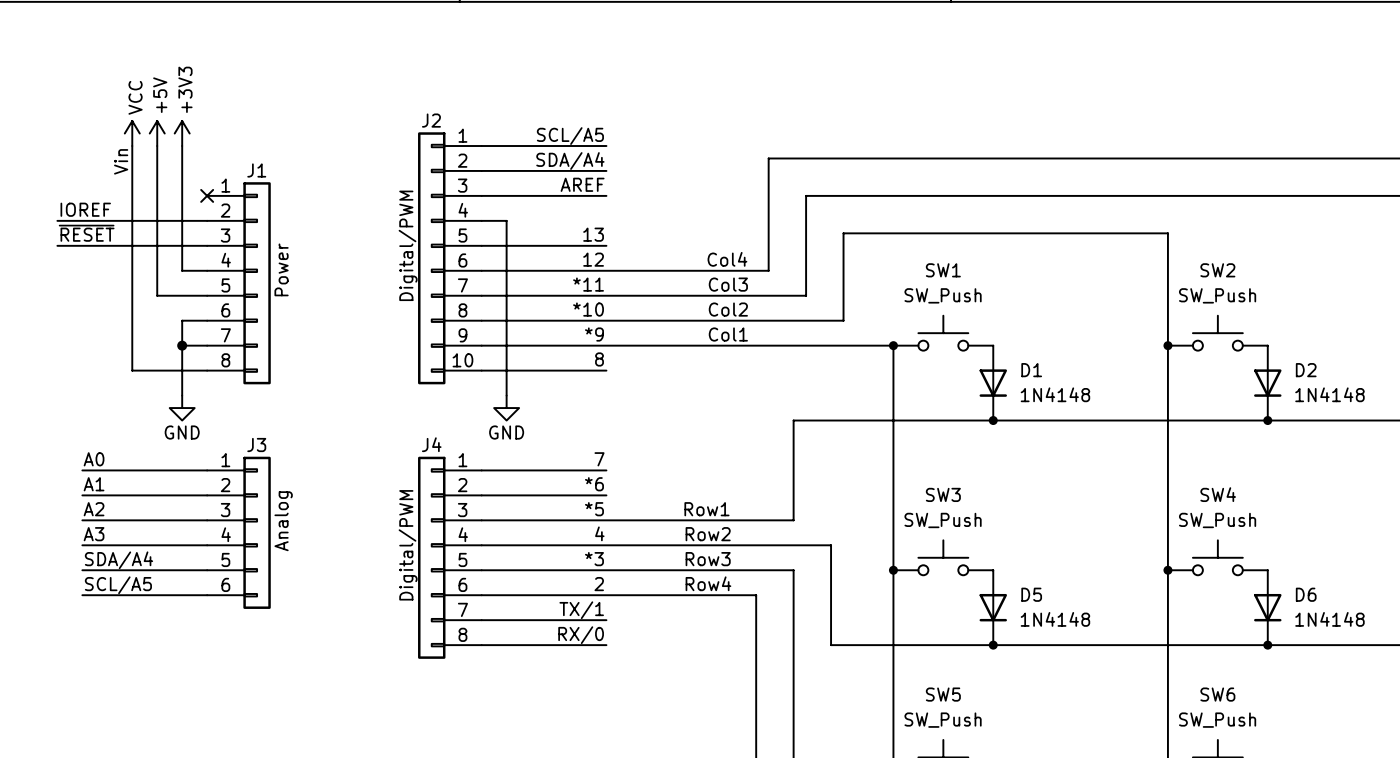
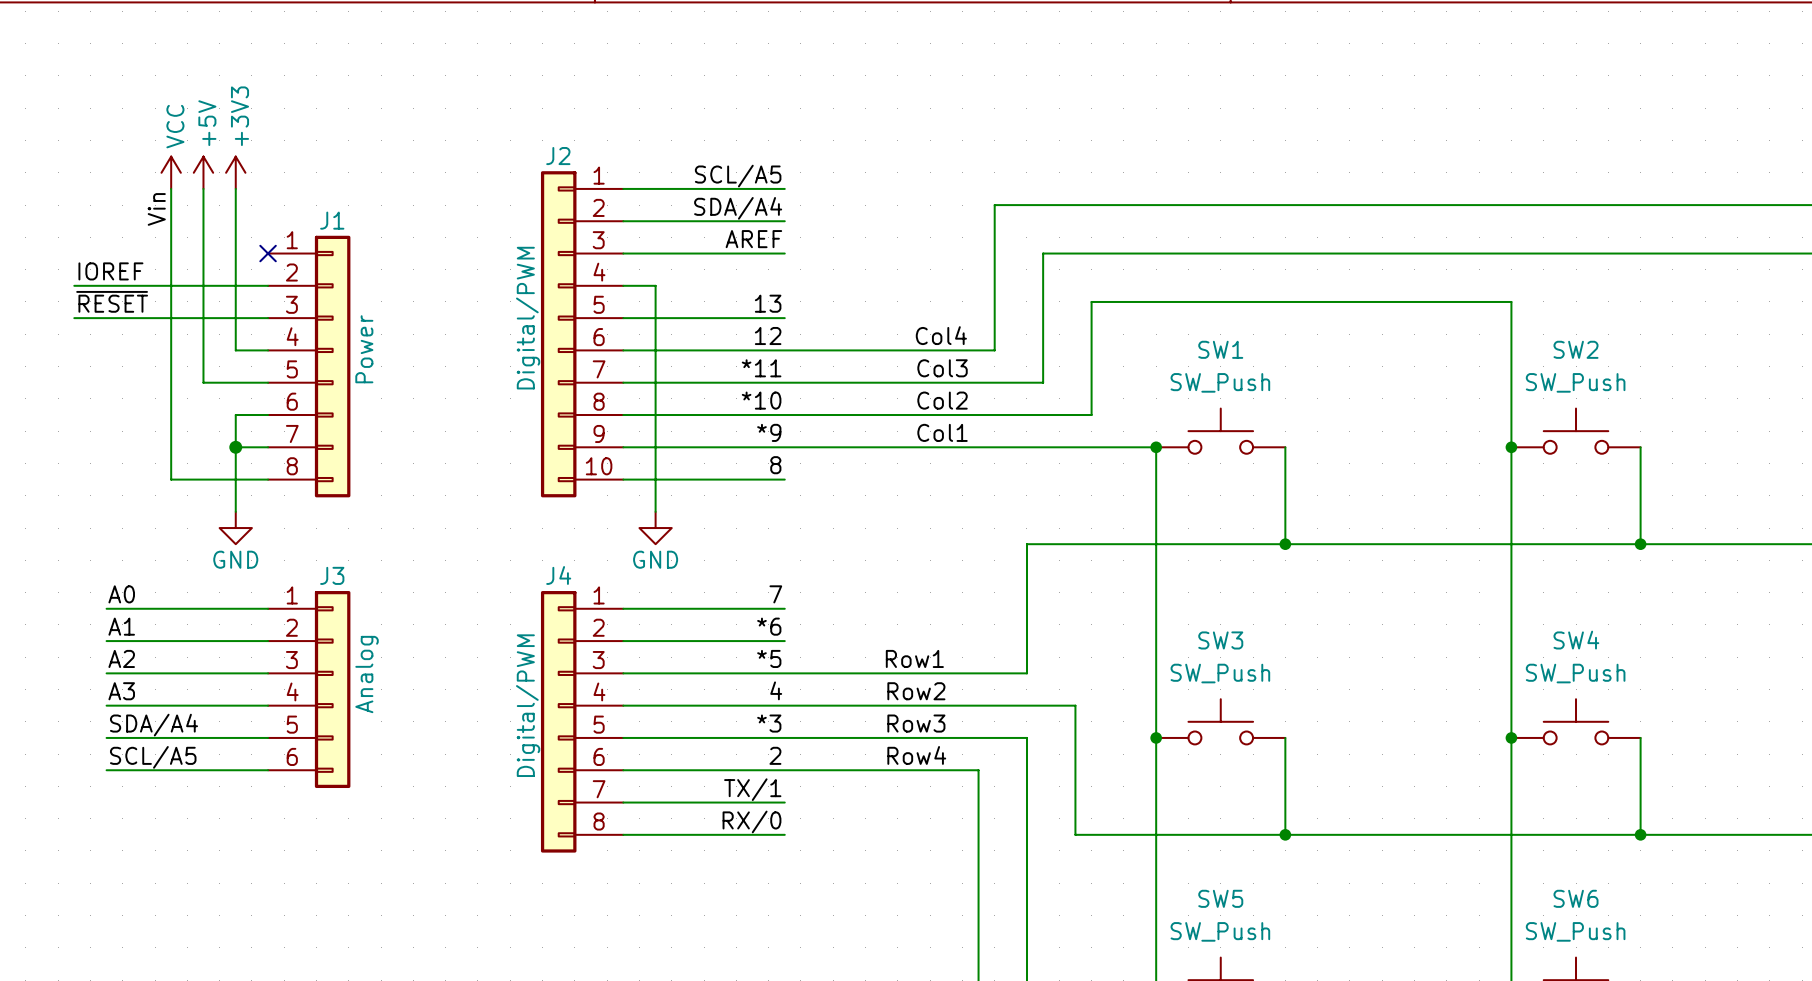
D1: 1N4148 (993, 383) -> none
D2: 1N4148 (1267, 383) -> none
D5: 1N4148 (993, 607) -> none
D6: 1N4148 (1267, 607) -> none

